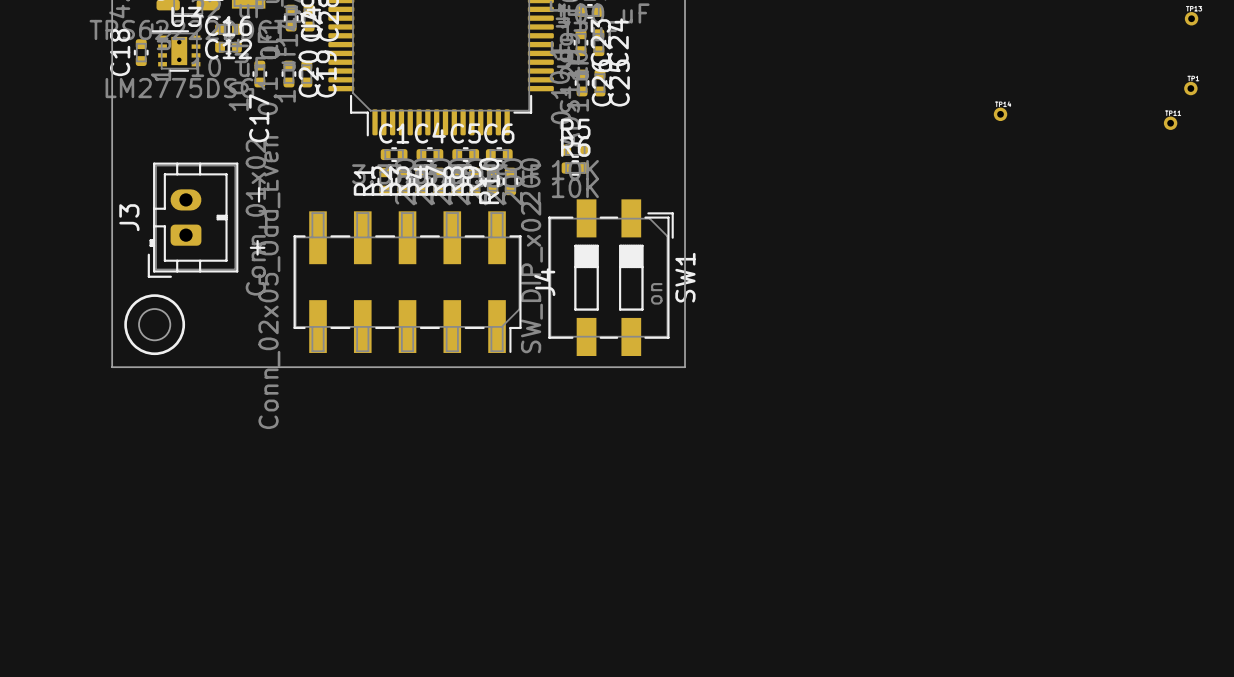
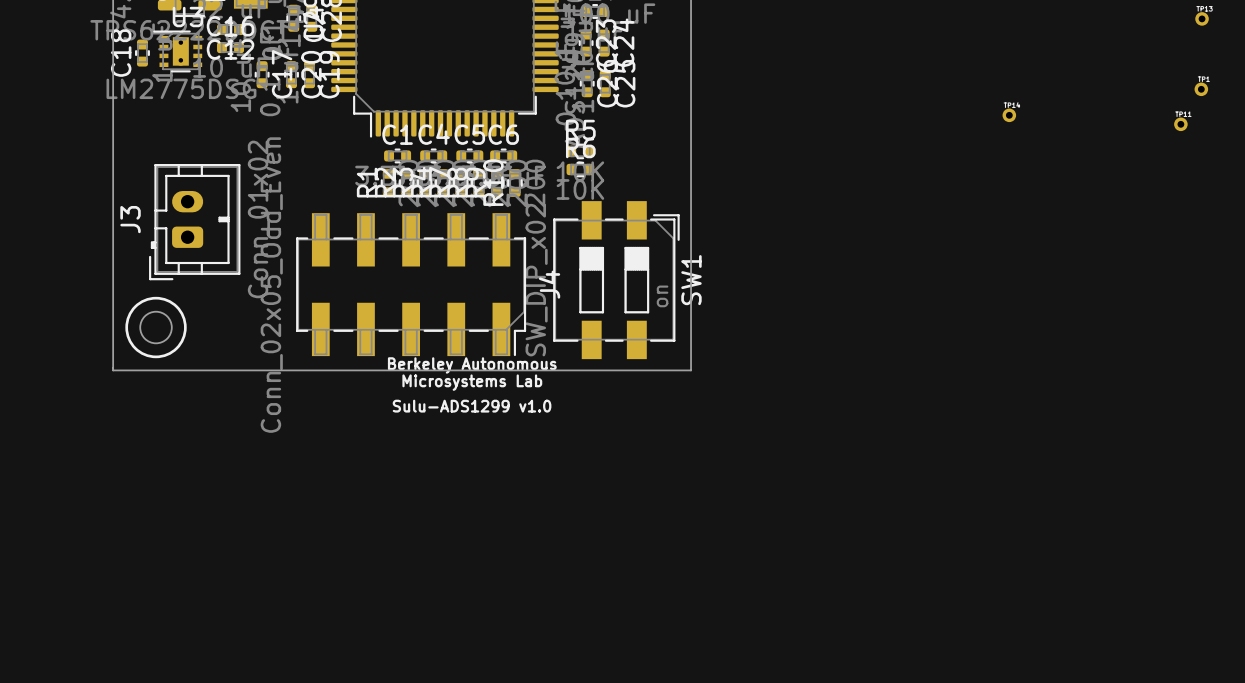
C17 name position: C17 (259, 118) -> C17 (282, 74)
text: - (259, 194) -> none
text: + (257, 247) -> none
text: none -> Berkeley Autonomous (472, 365)
text: none -> Microsystems Lab (472, 382)
text: none -> Sulu-ADS1299 v1.0 (472, 406)

